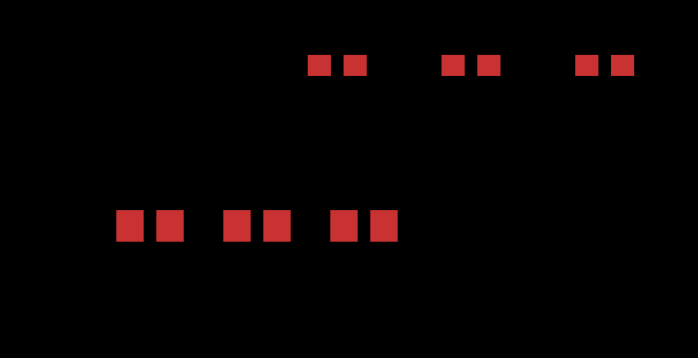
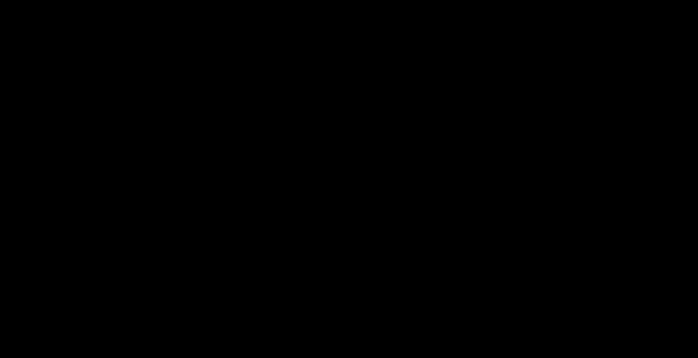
part: (337, 65) -> none
part: (470, 65) -> none
part: (604, 65) -> none
part: (150, 225) -> none
part: (256, 225) -> none
part: (363, 225) -> none

